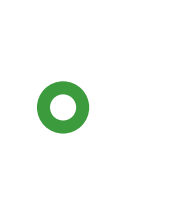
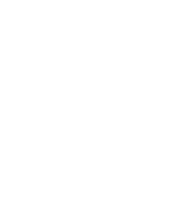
part: (63, 107) -> none

